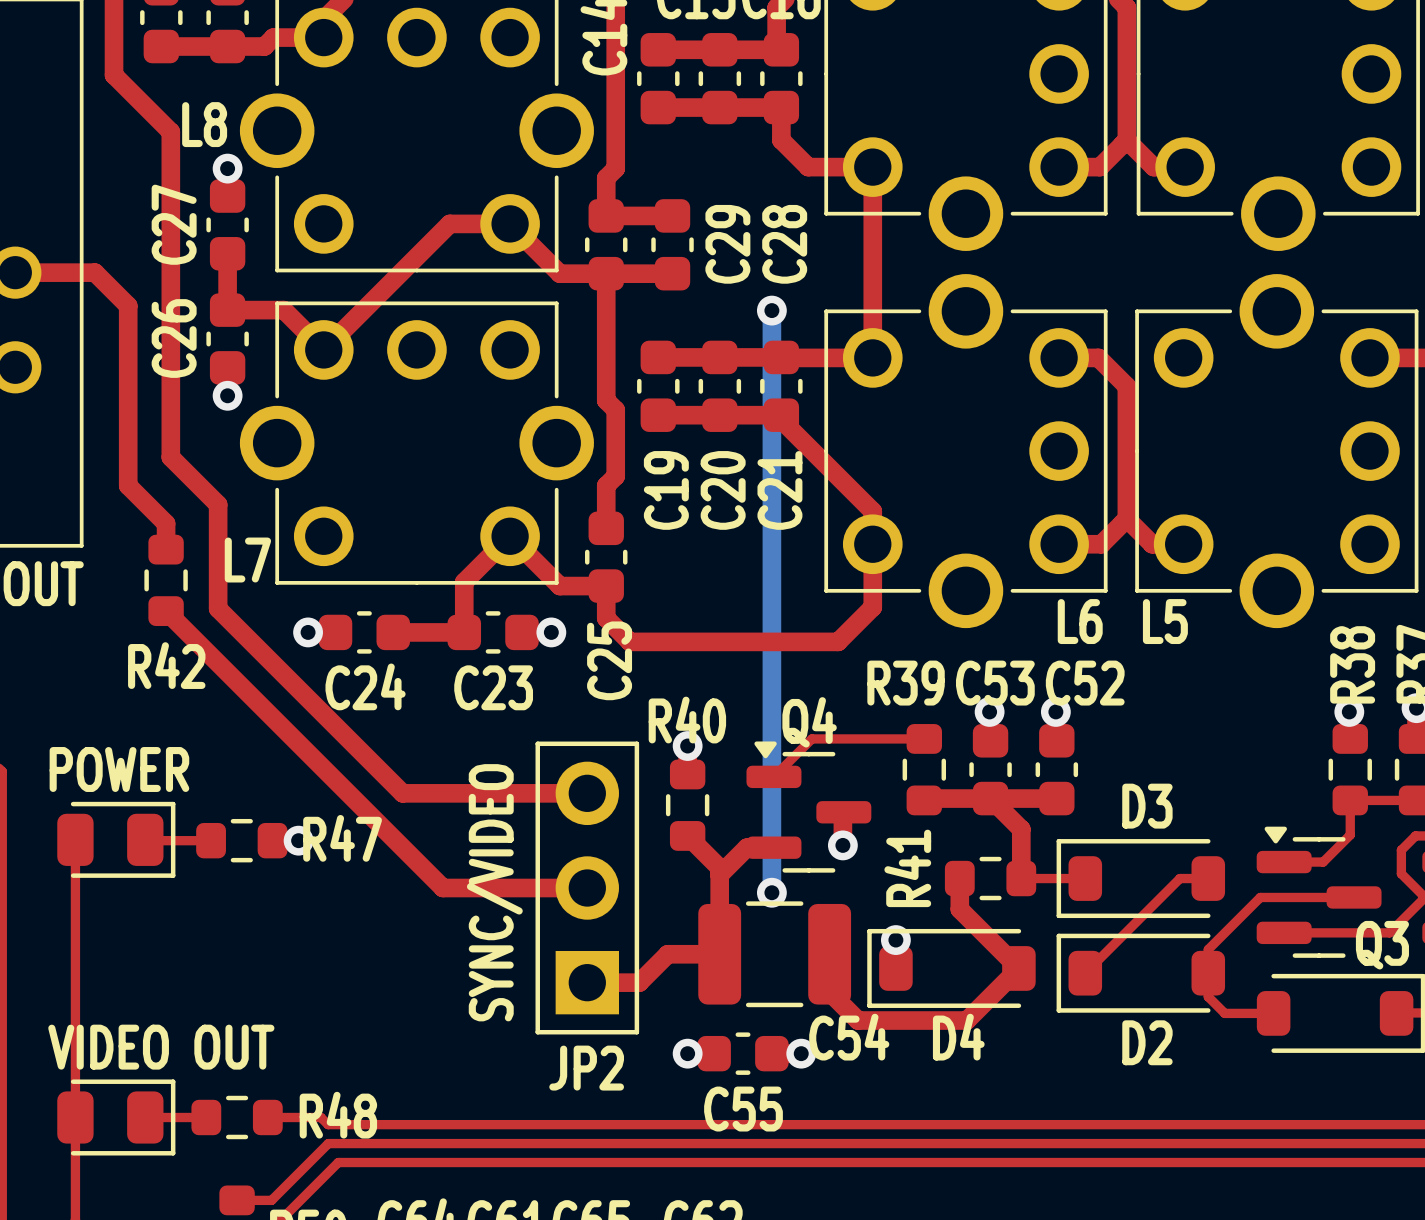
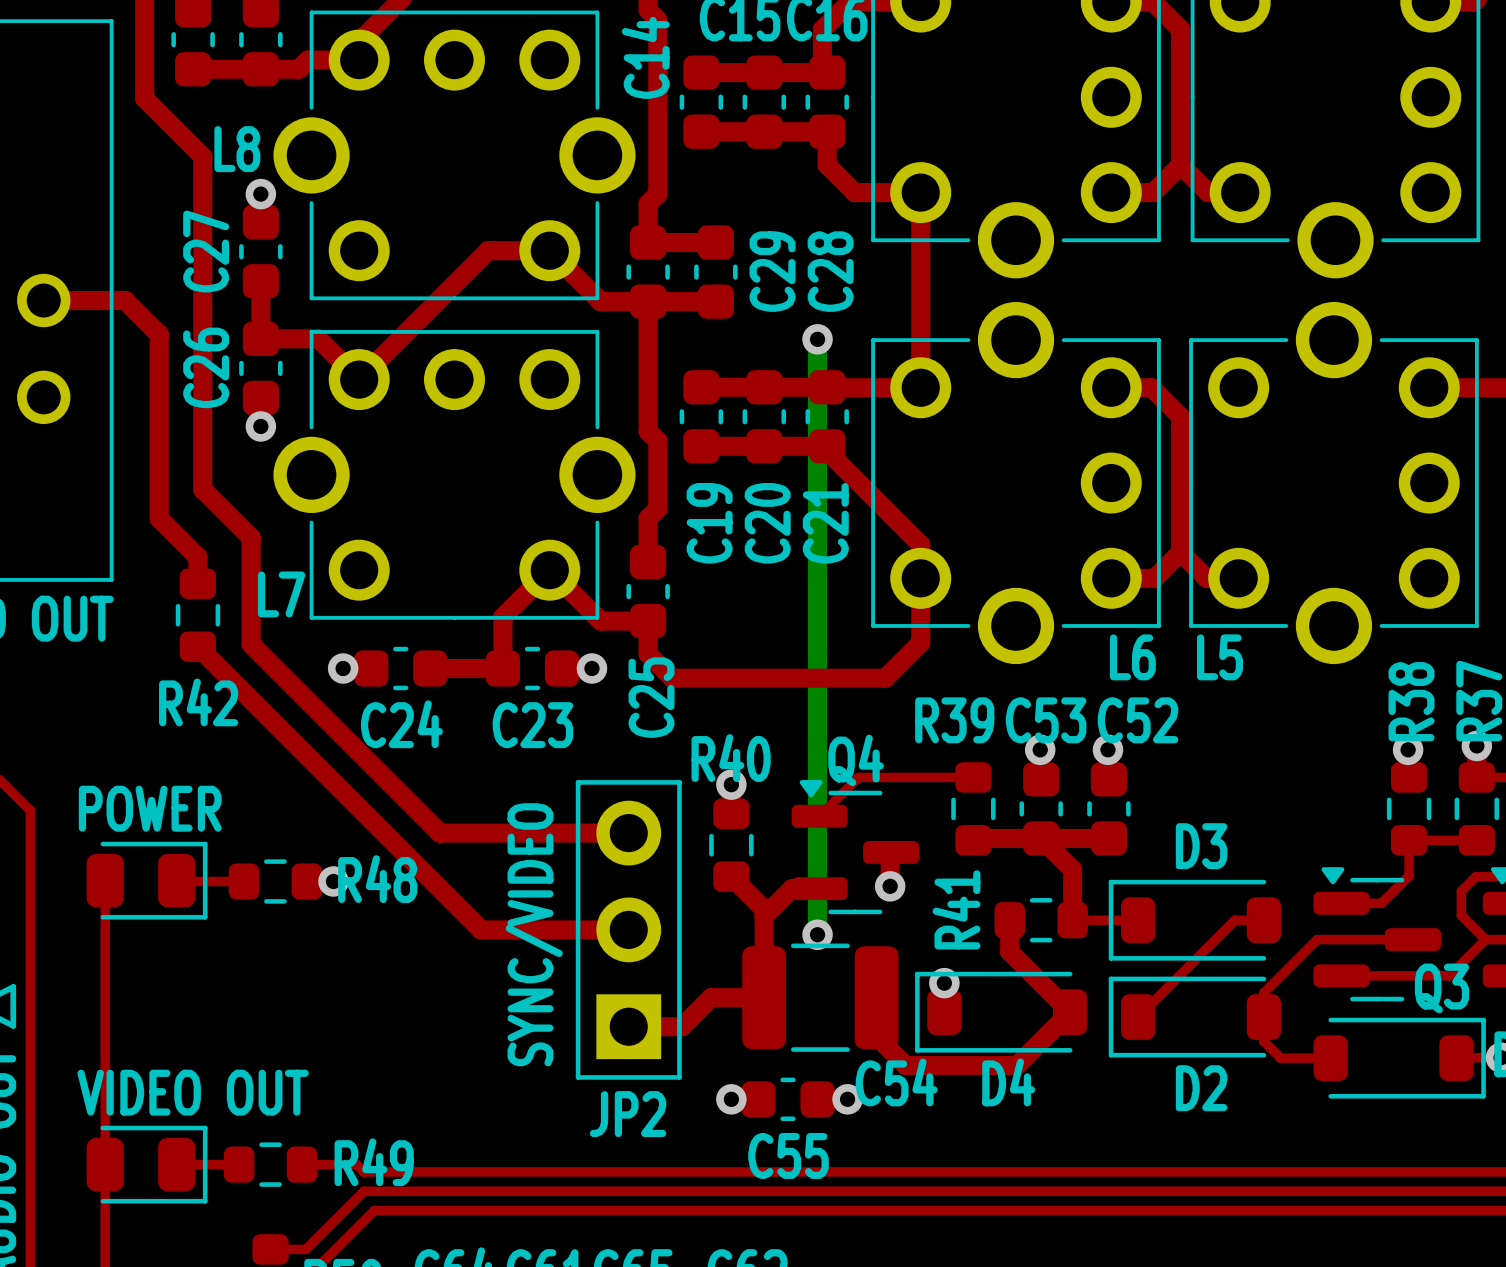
R47 name: R47 (342, 838) -> R48 (377, 879)
R48 name: R48 (338, 1115) -> R49 (374, 1162)

